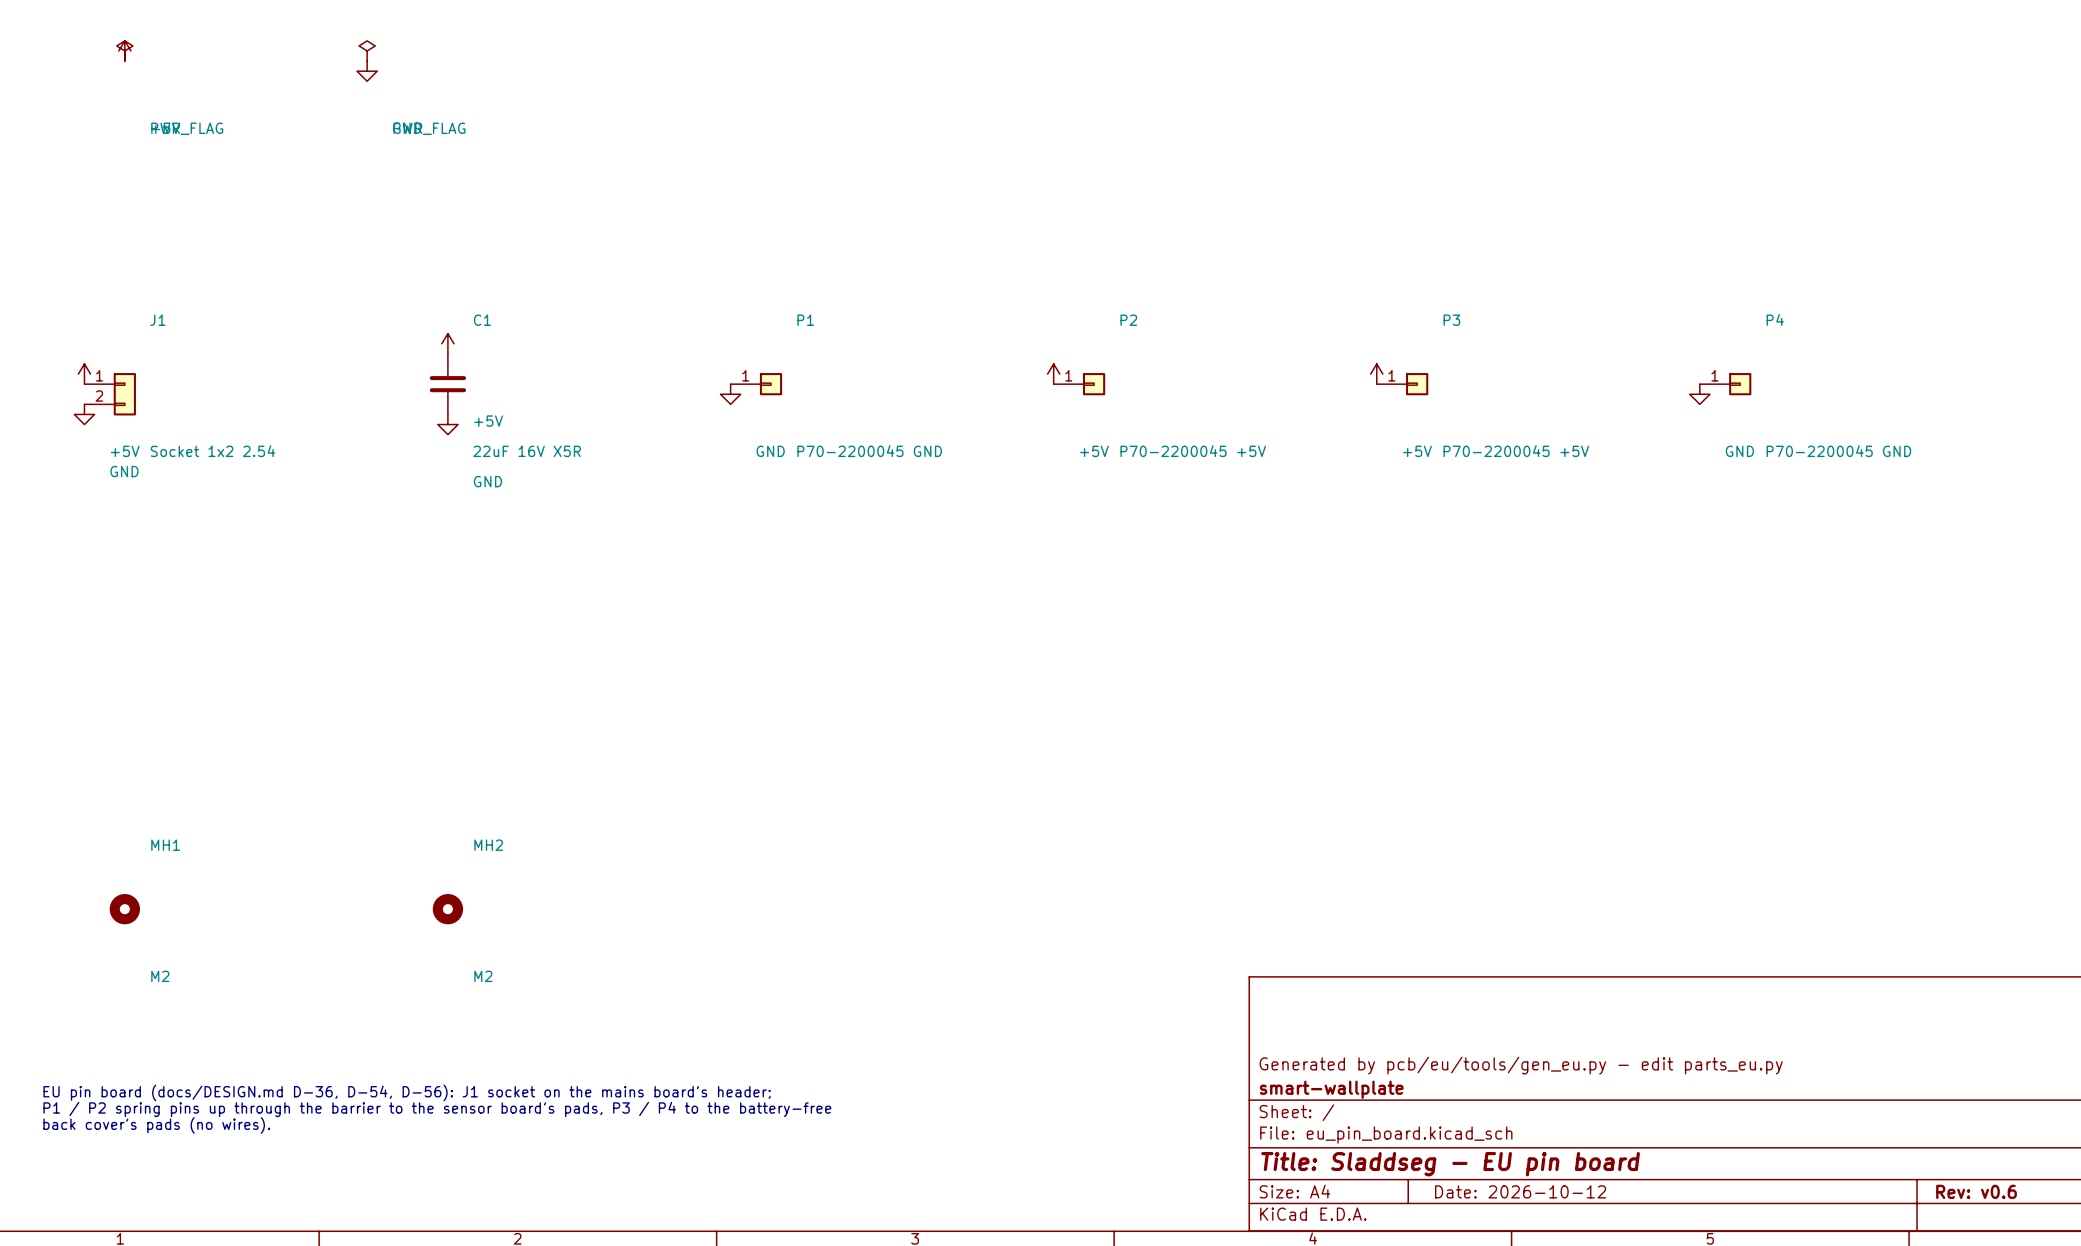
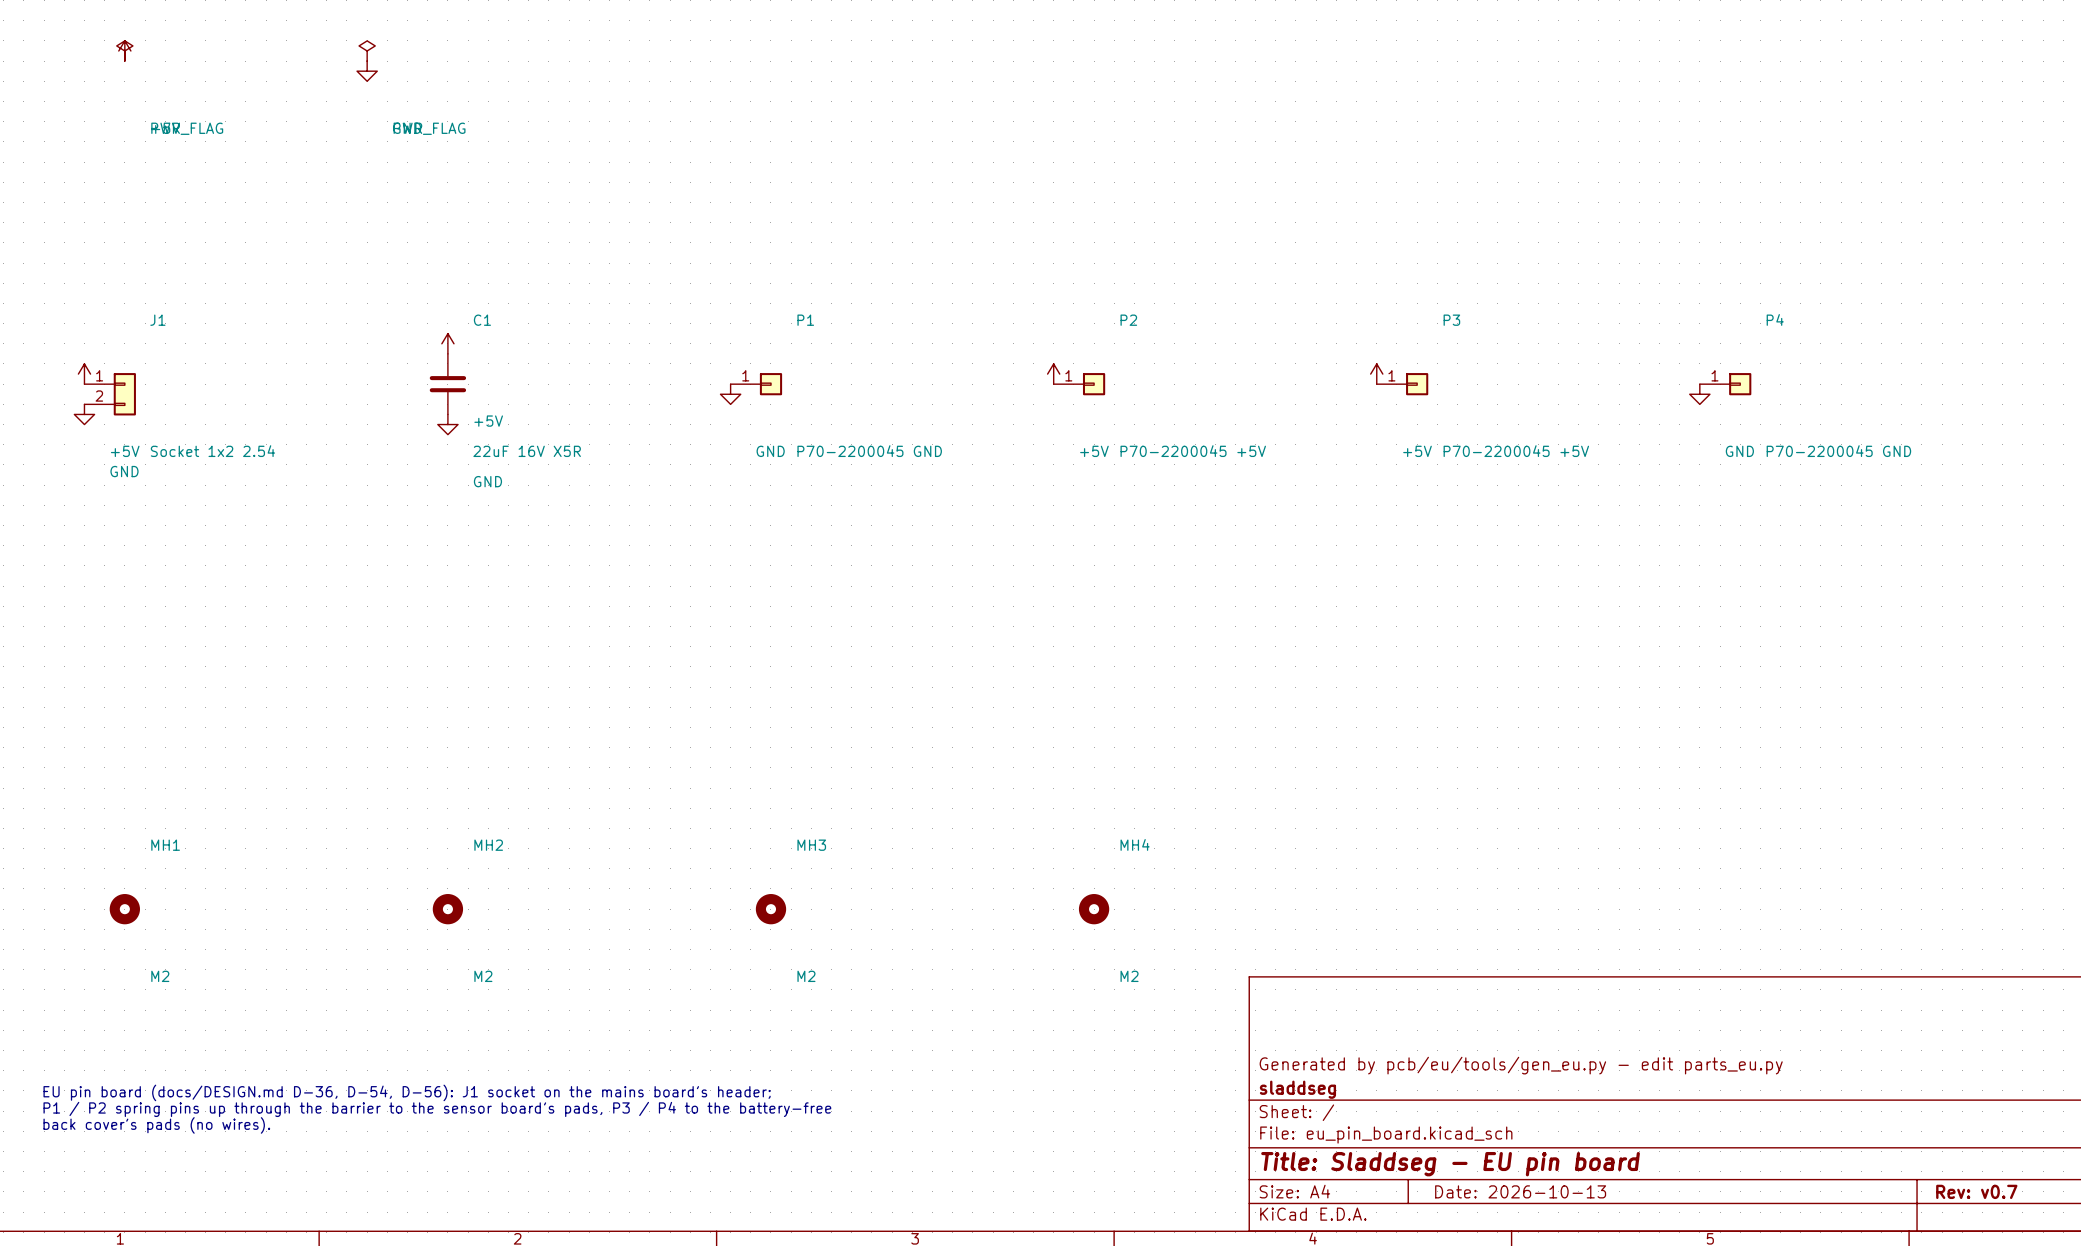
MH3: none -> M2 (770, 909)
MH4: none -> M2 (1094, 909)
title block: smart-wallplate (1331, 1089) -> sladdseg (1297, 1089)
title block: Date: 2026-10-12 (1520, 1191) -> Date: 2026-10-13 (1520, 1191)
title block: Rev: v0.6 (1976, 1191) -> Rev: v0.7 (1976, 1191)

